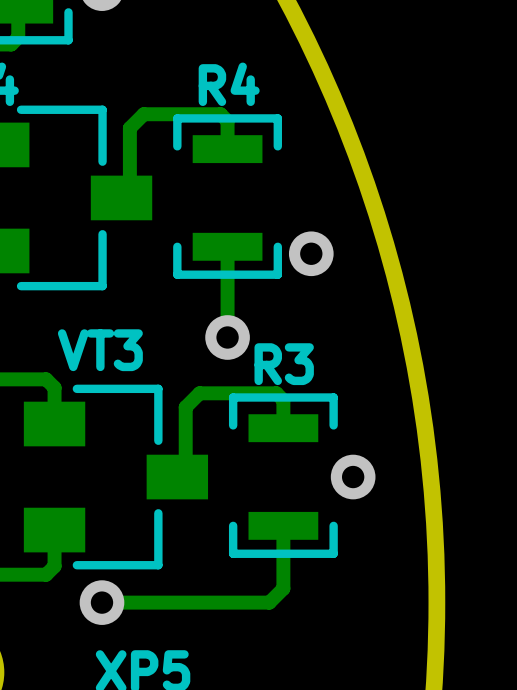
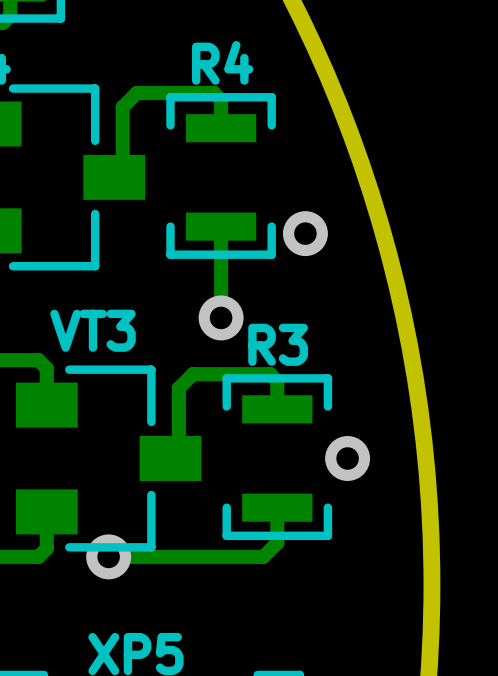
track: (283, 560) (283, 588) (269, 602) (101, 602) -> (277, 542) (263, 556) (108, 556)
via position: (101, 602) -> (108, 556)

